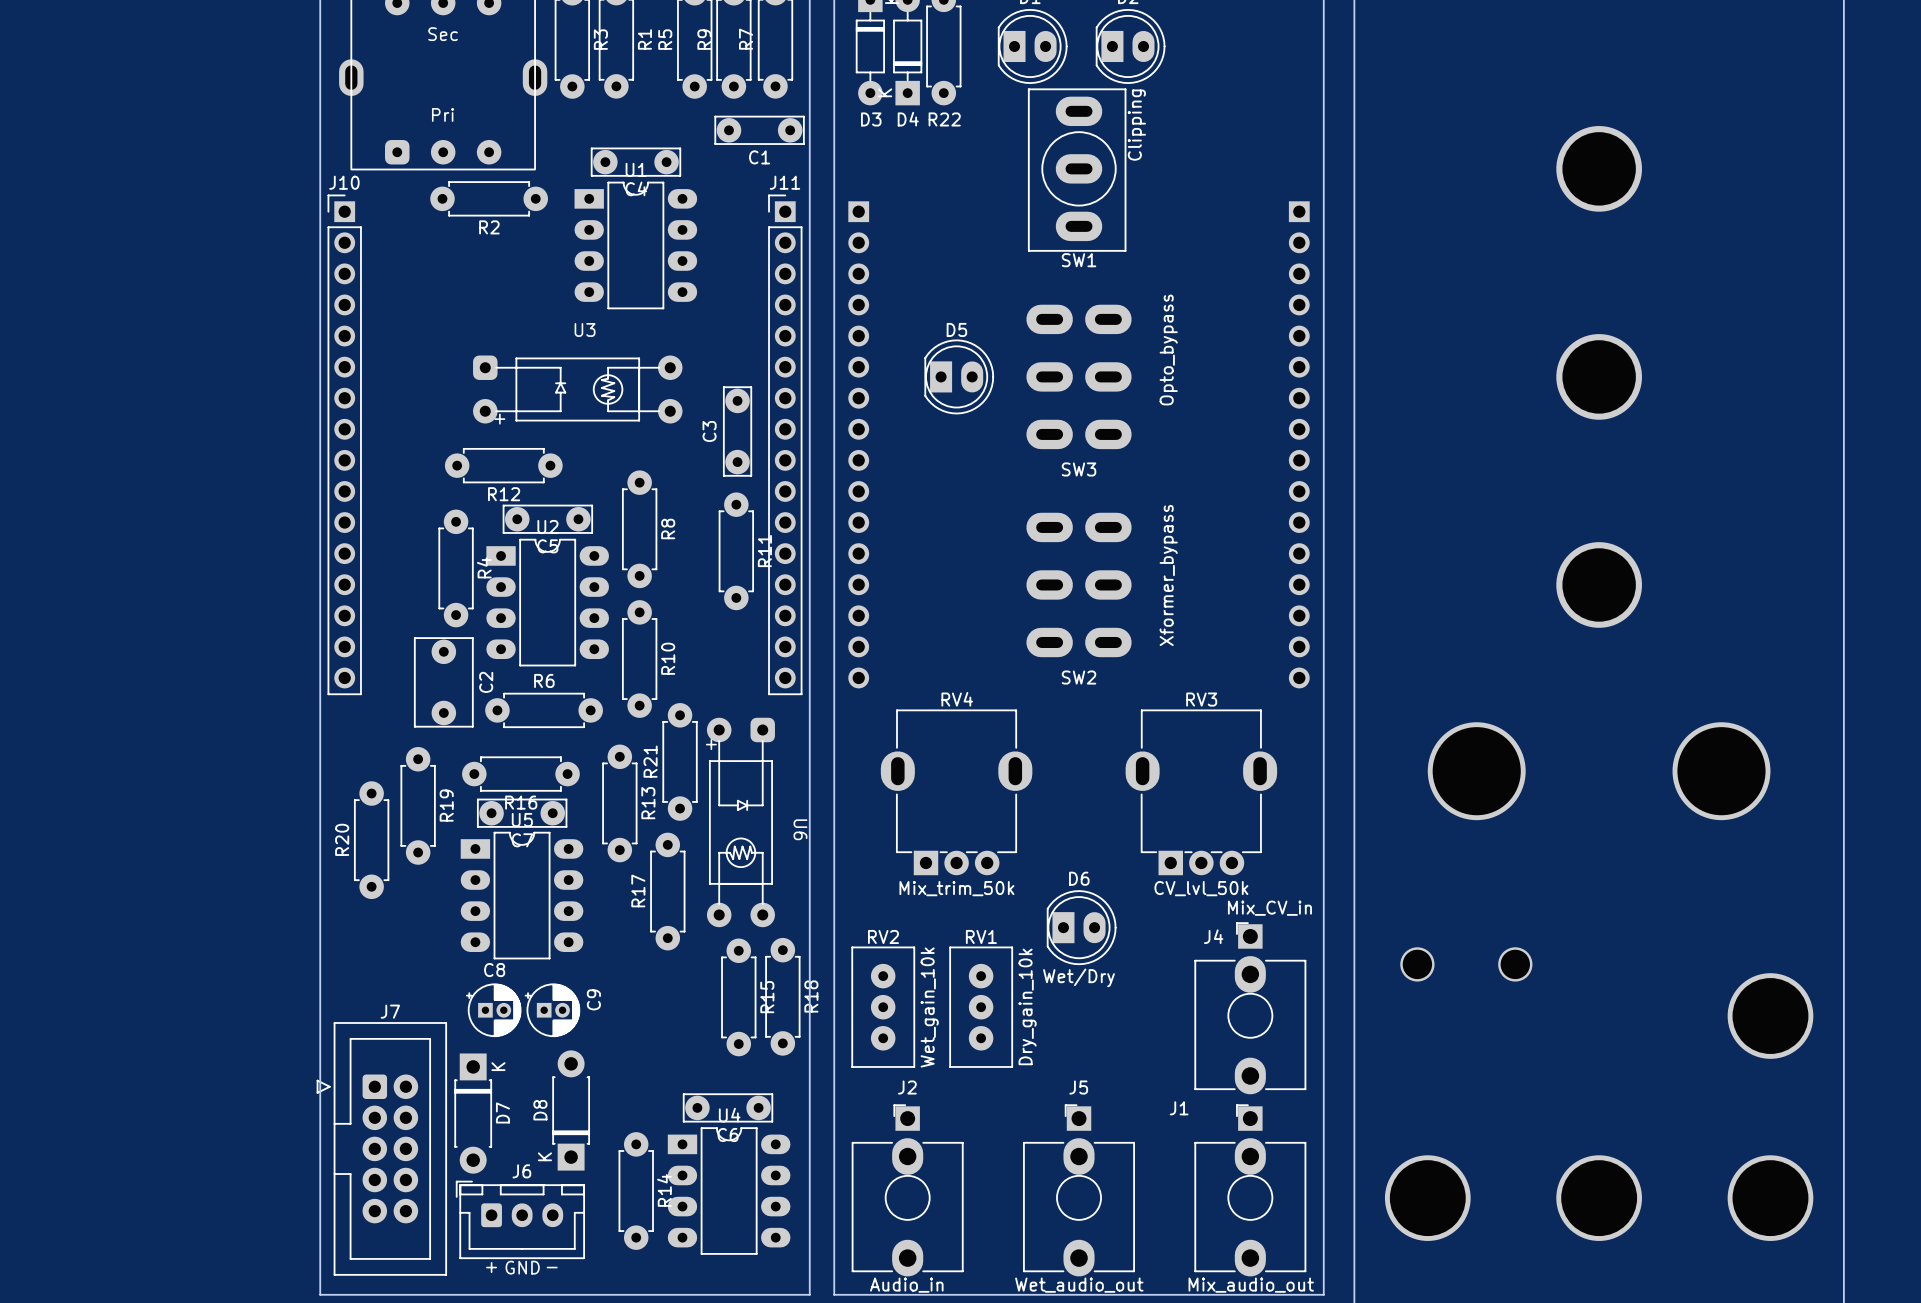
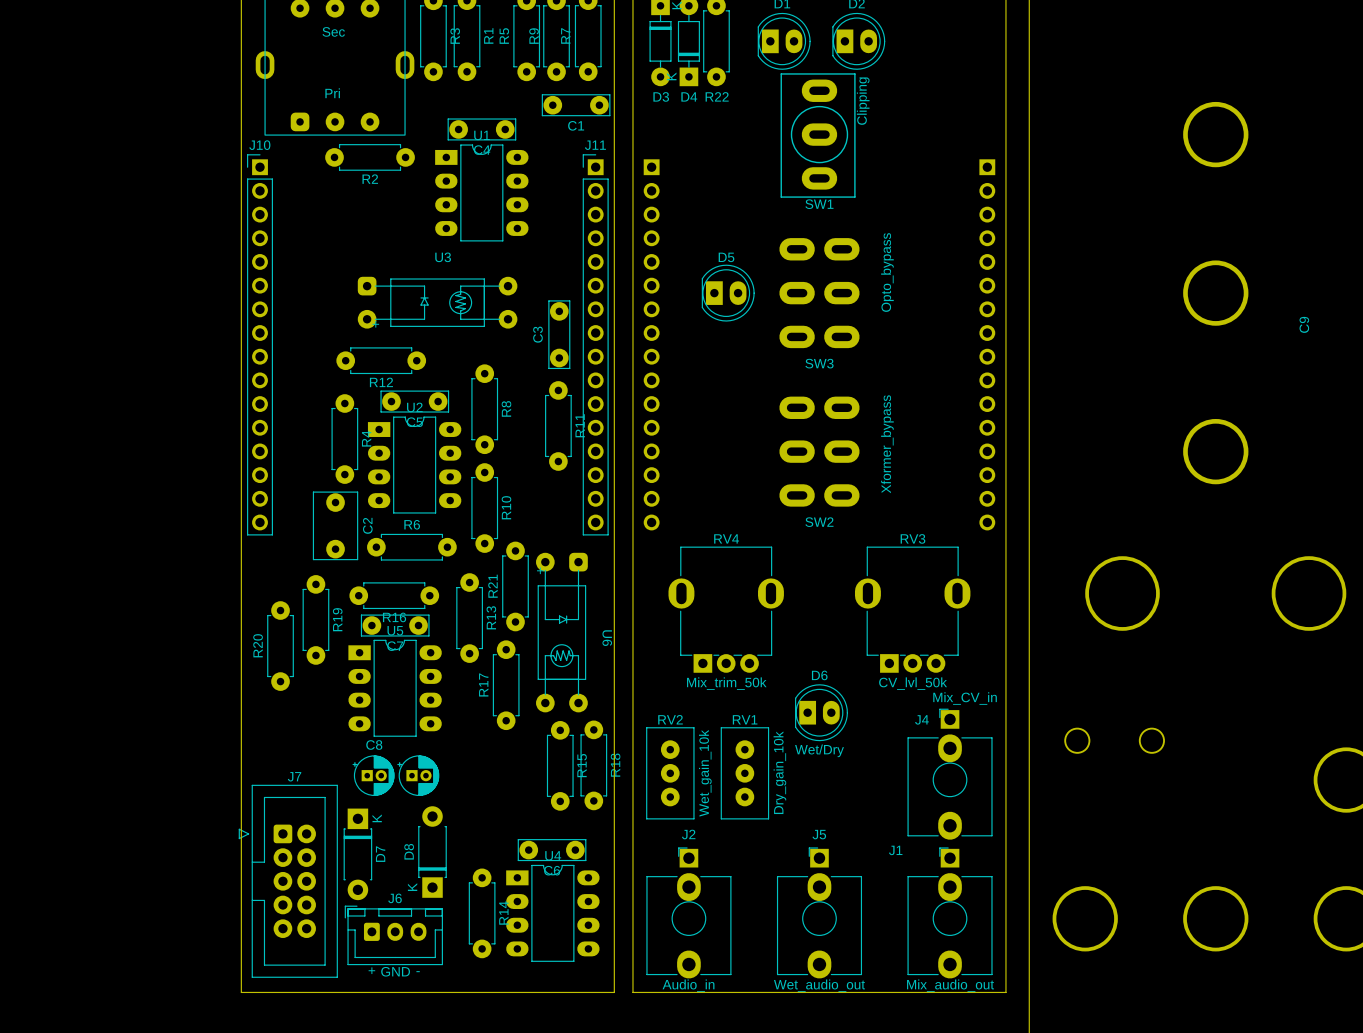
C9 name position: C9 (593, 999) -> C9 (1304, 324)

